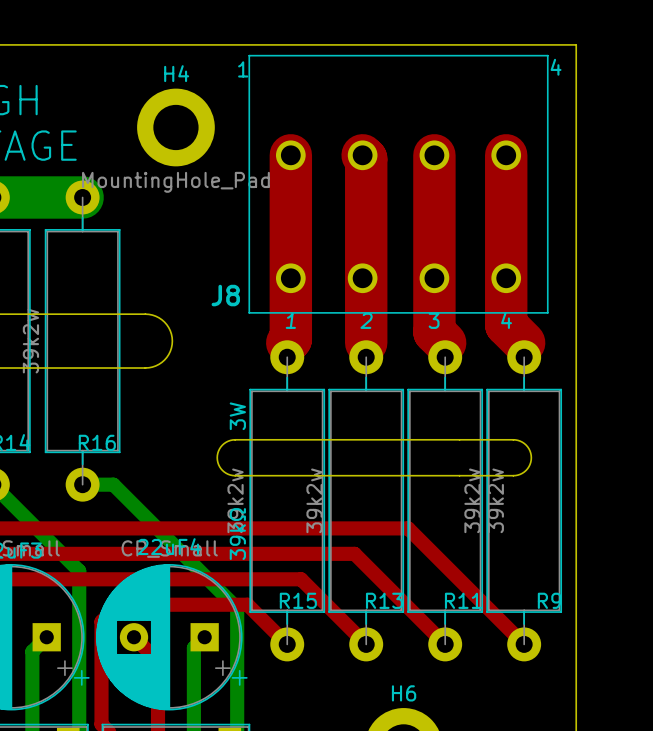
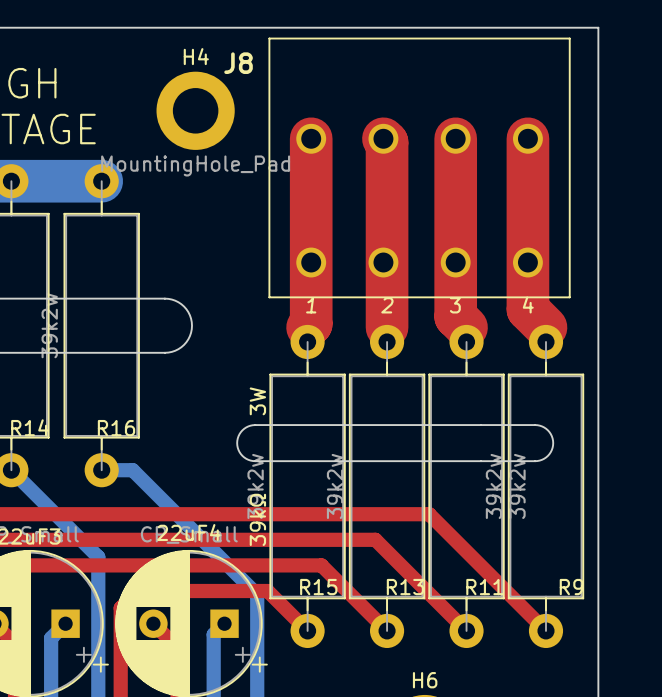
text: 4 (556, 67) -> none
text: 1 (243, 69) -> none
J8 name position: J8 (225, 295) -> J8 (238, 63)

